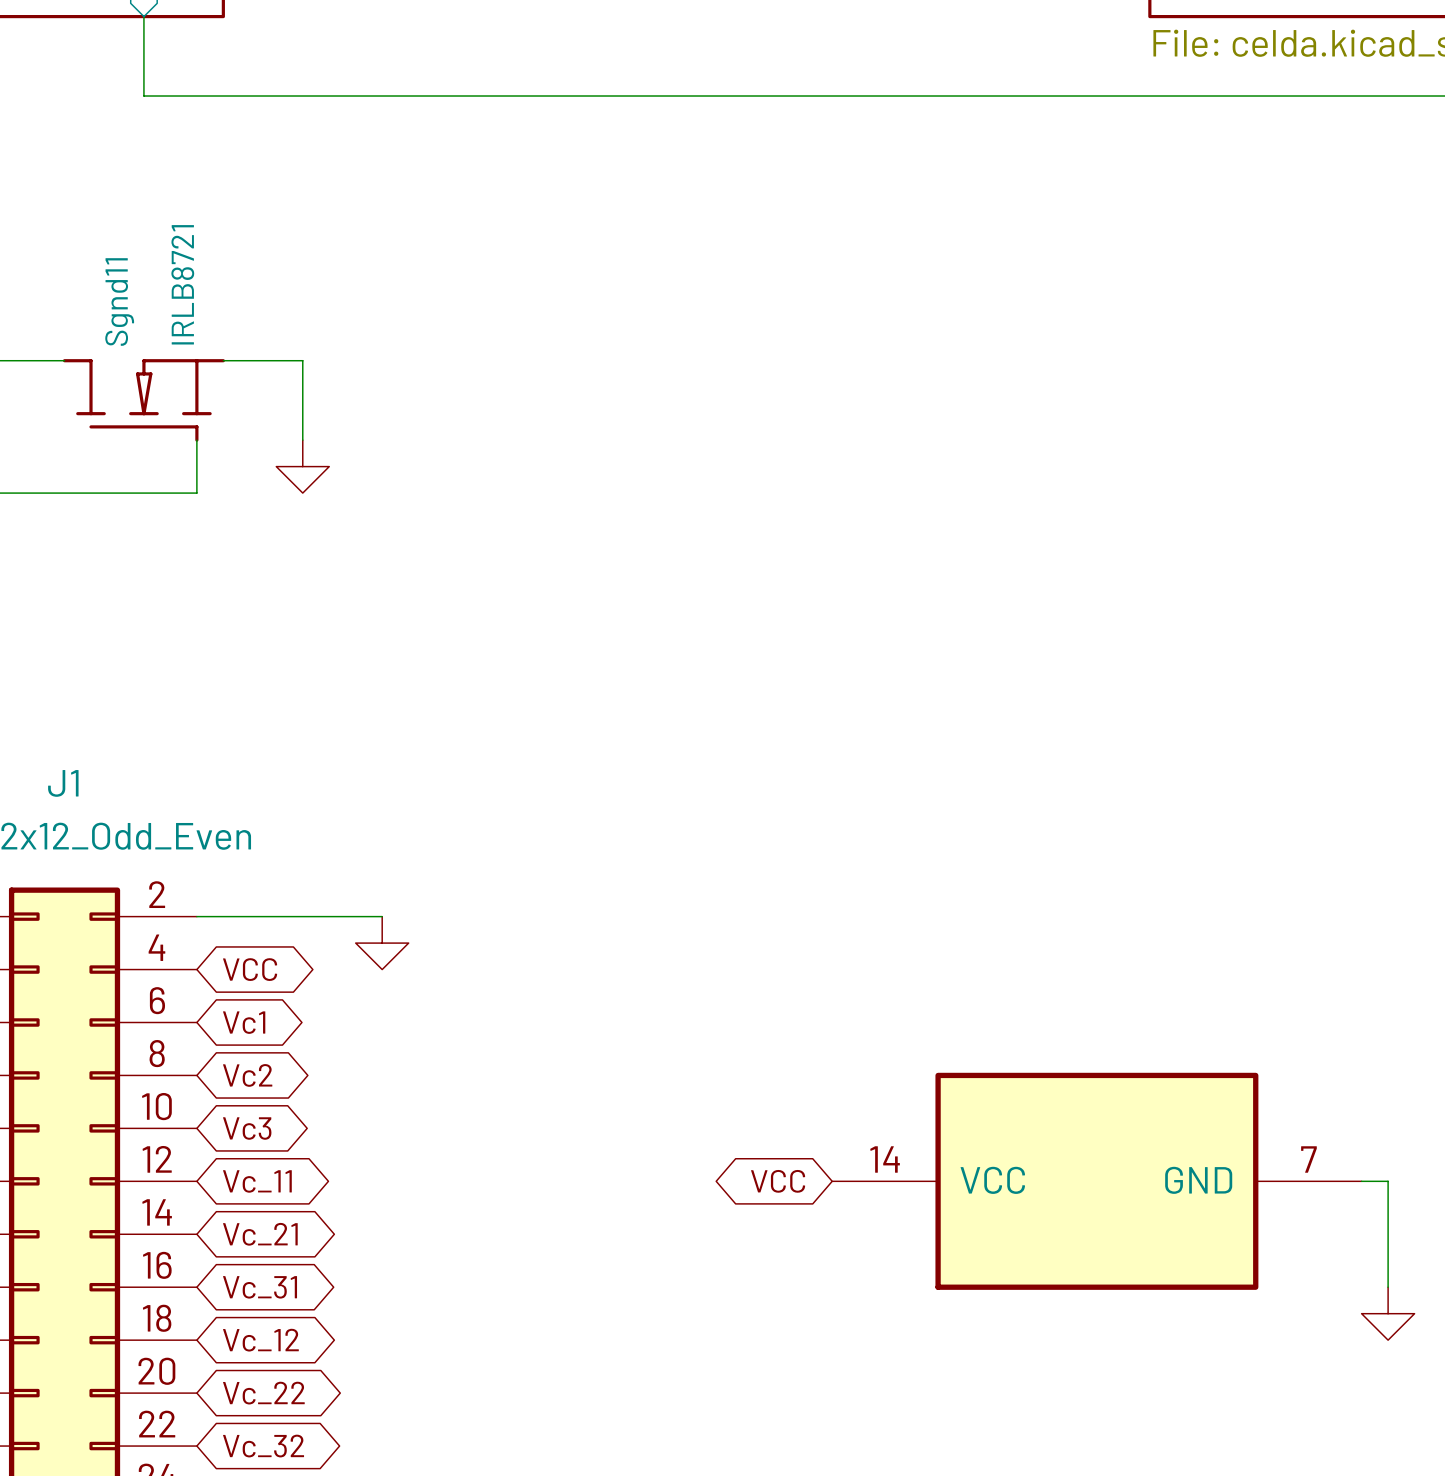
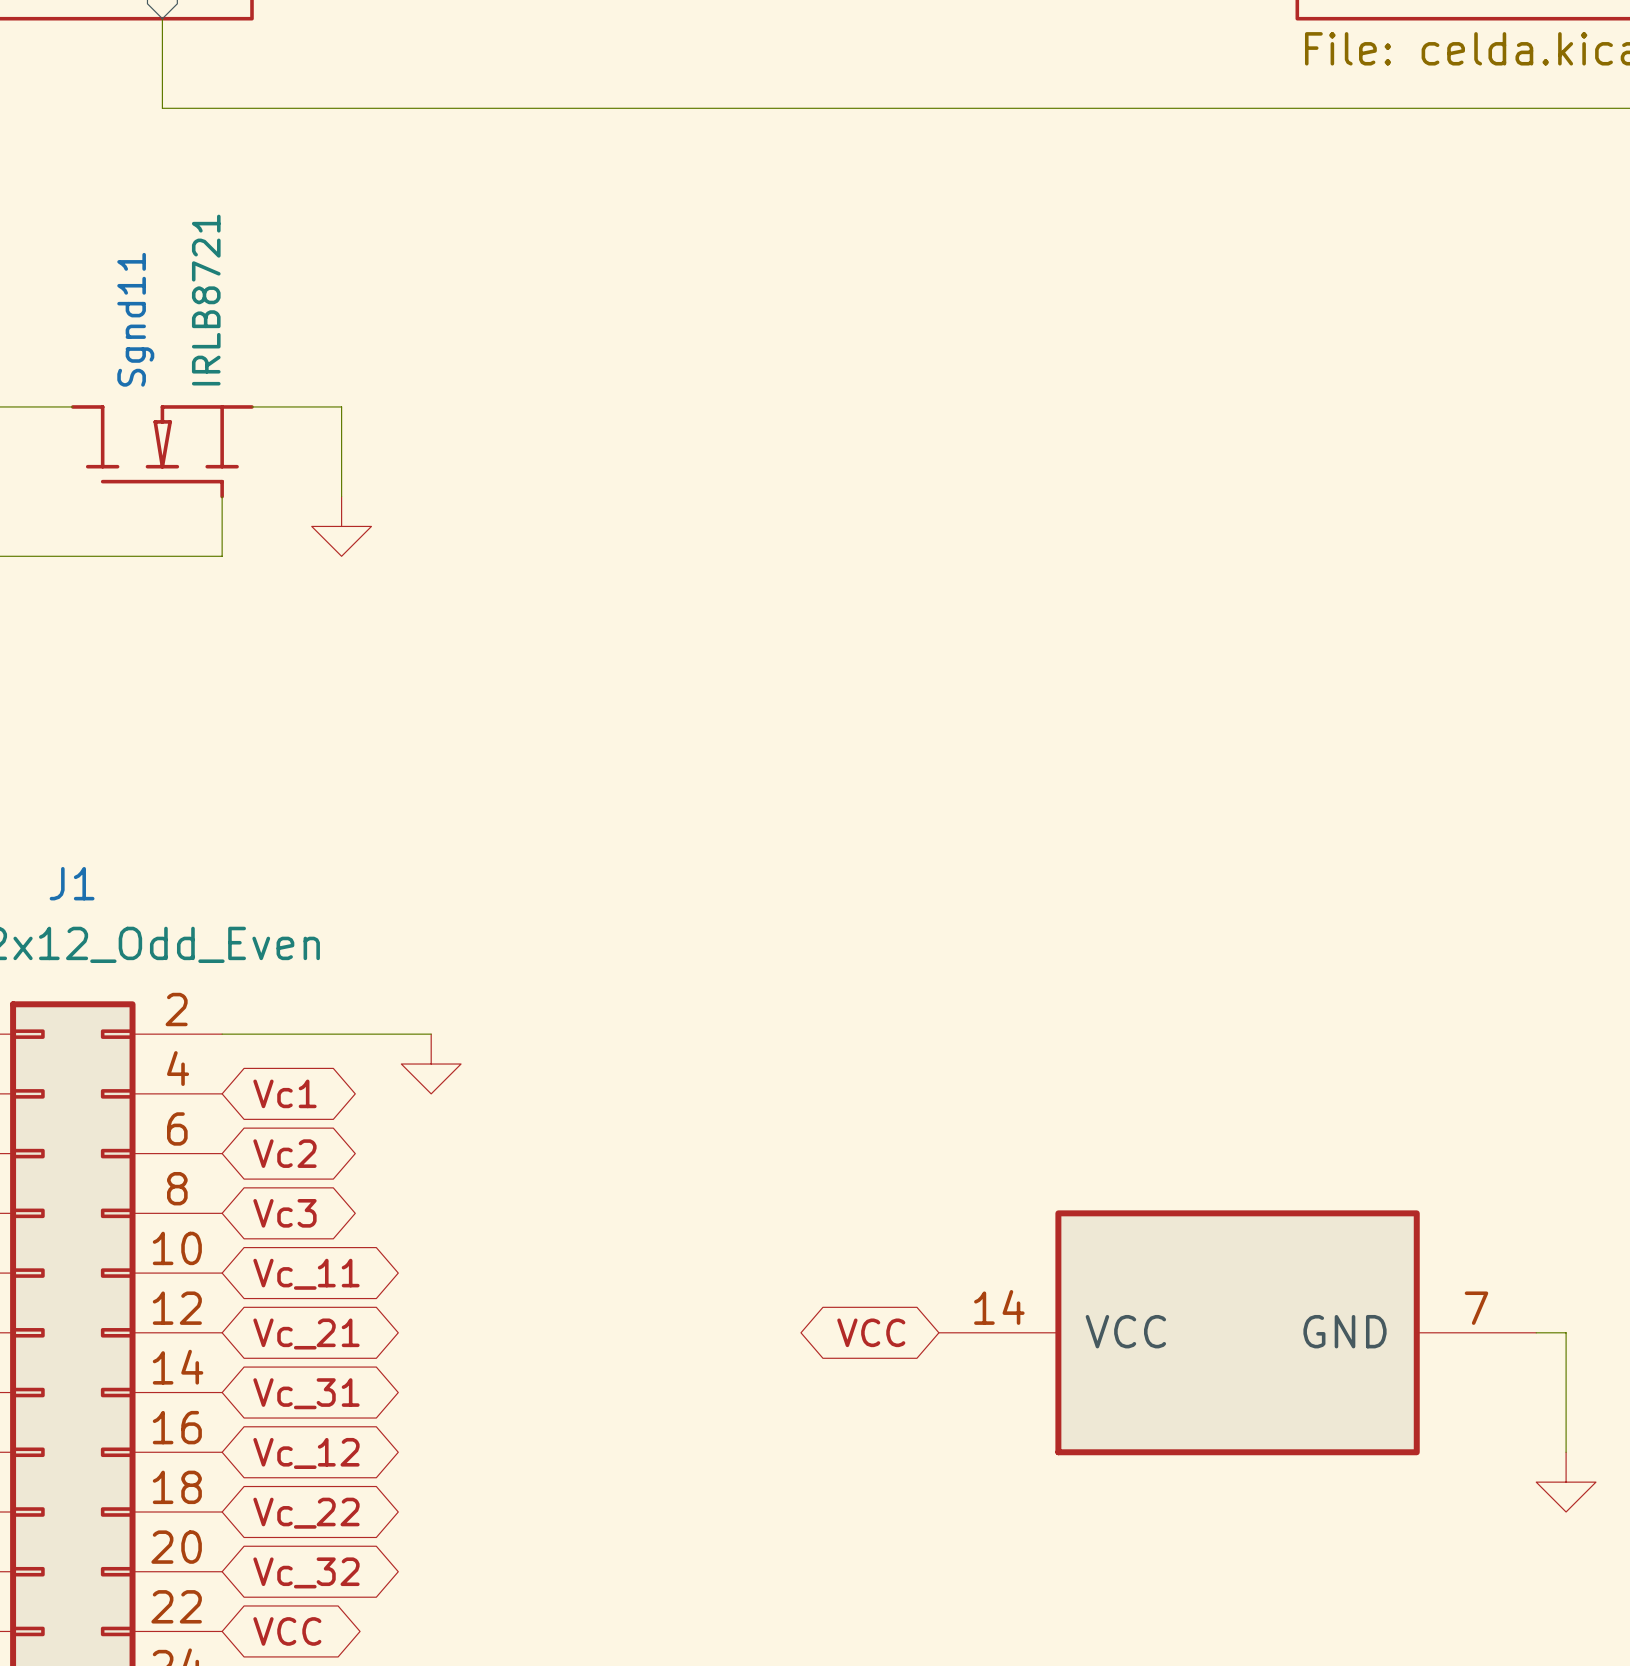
global label: VCC (250, 969) -> Vc1 (284, 1093)
global label: Vc1 (244, 1022) -> Vc2 (284, 1153)
global label: Vc2 (247, 1075) -> Vc3 (284, 1213)
global label: Vc3 (247, 1128) -> Vc_11 (306, 1274)
global label: Vc_11 (257, 1181) -> Vc_21 (306, 1334)
global label: Vc_21 (260, 1234) -> Vc_31 (306, 1393)
global label: Vc_31 (260, 1287) -> Vc_12 (306, 1453)
global label: Vc_12 (260, 1340) -> Vc_22 (306, 1513)
global label: Vc_22 (263, 1393) -> Vc_32 (306, 1572)
global label: Vc_32 (263, 1446) -> VCC (287, 1631)

